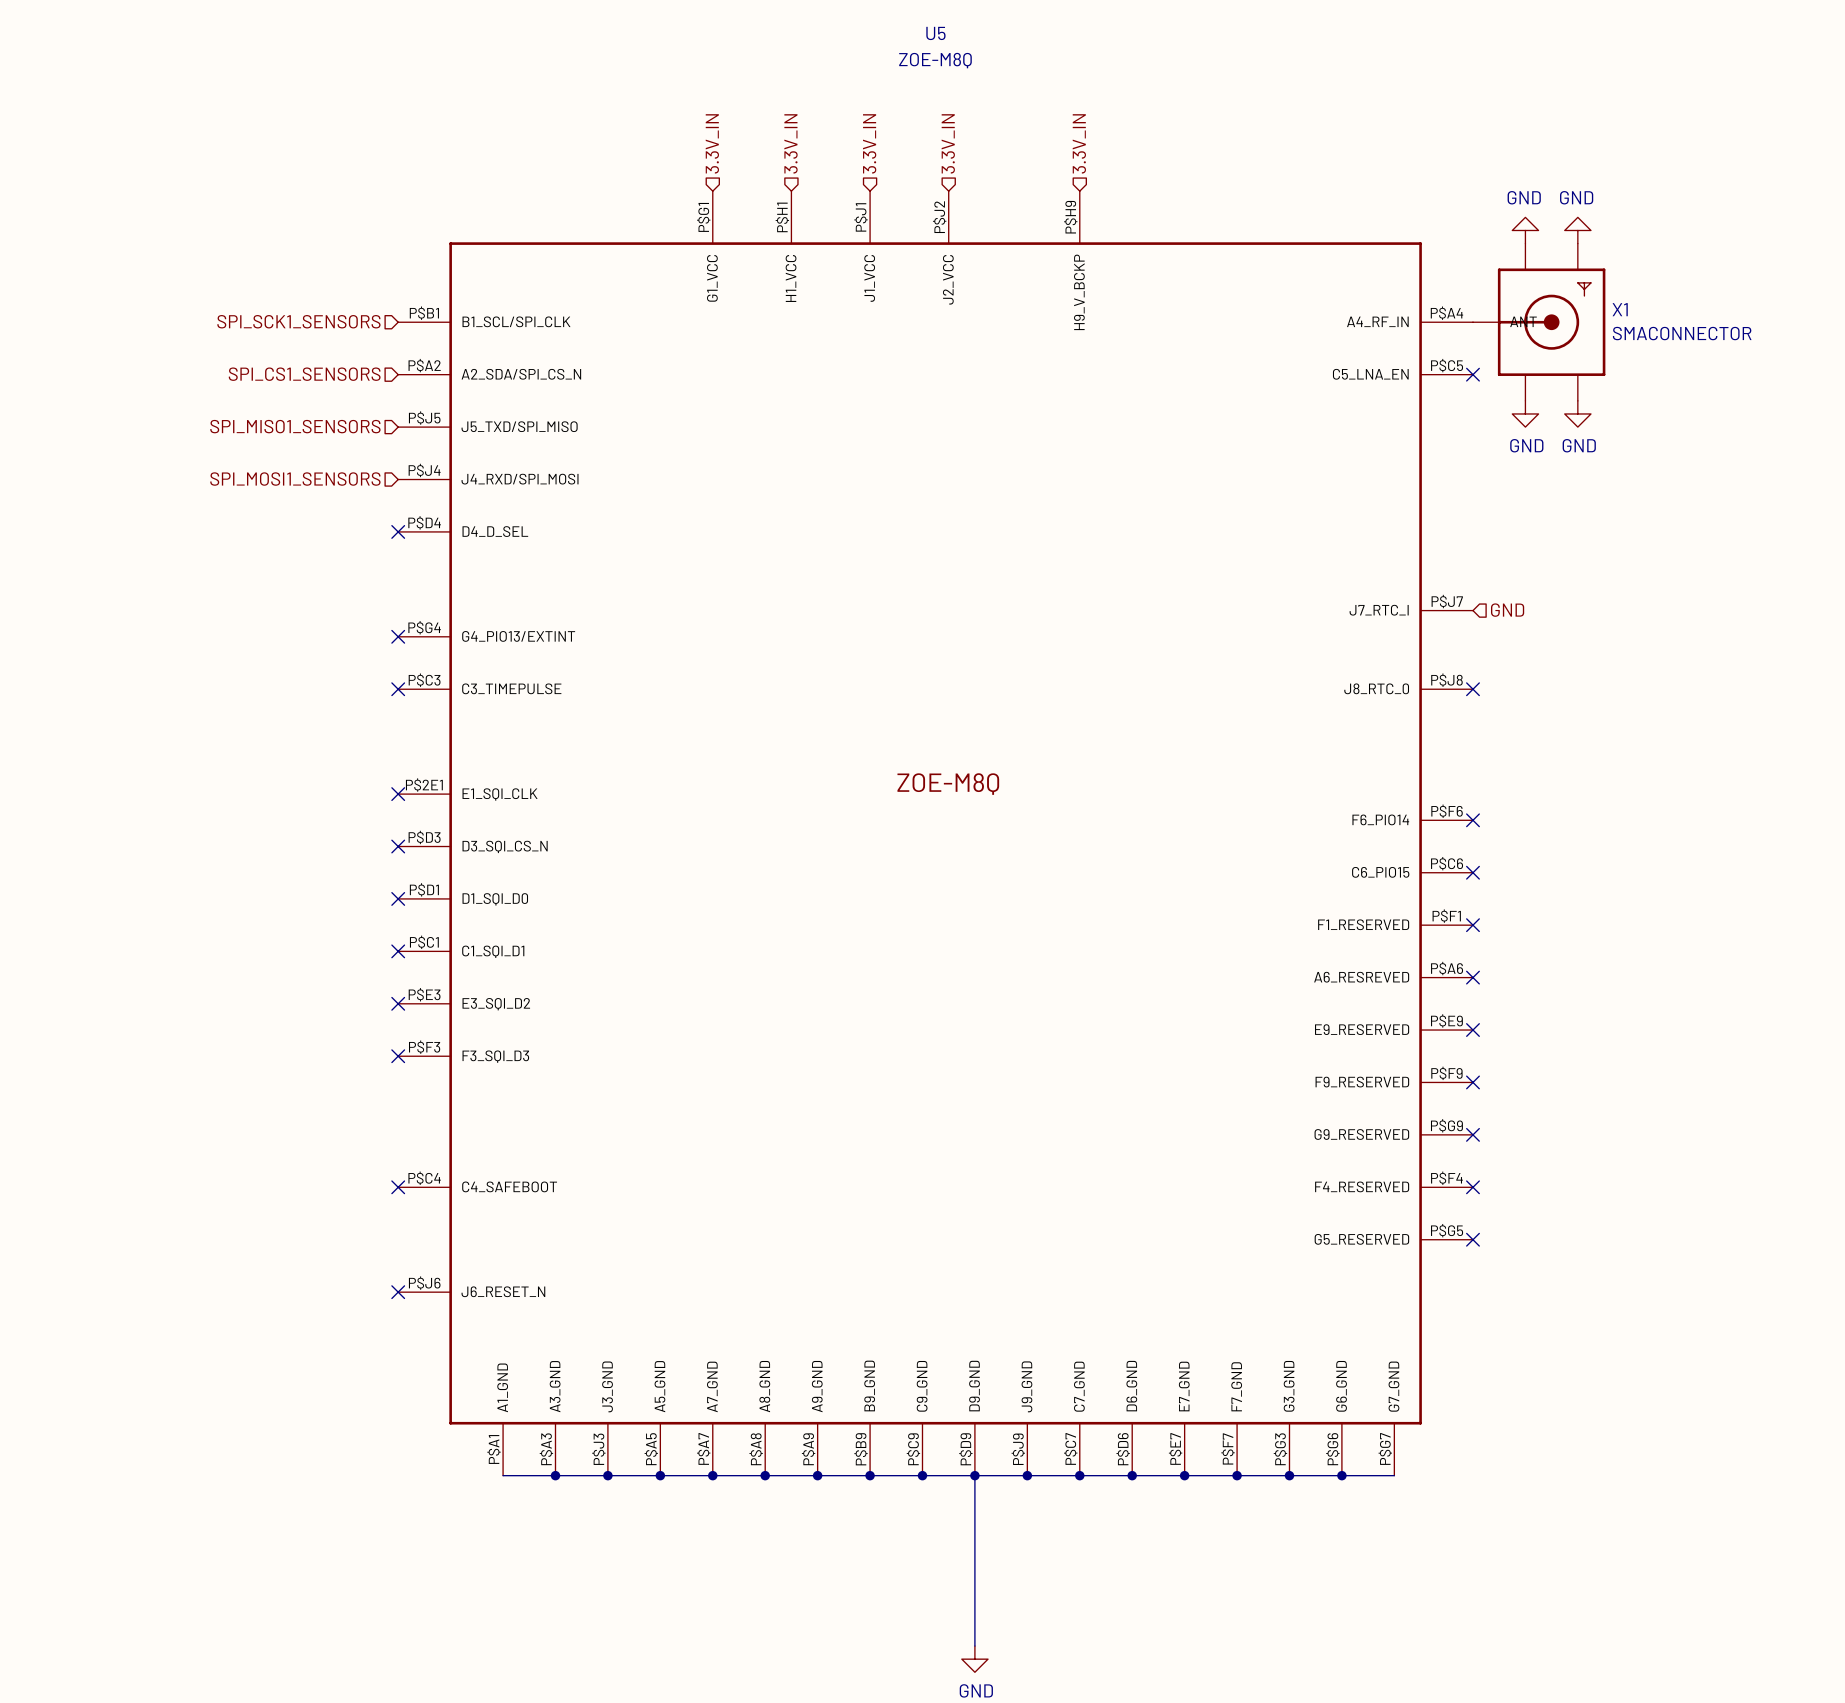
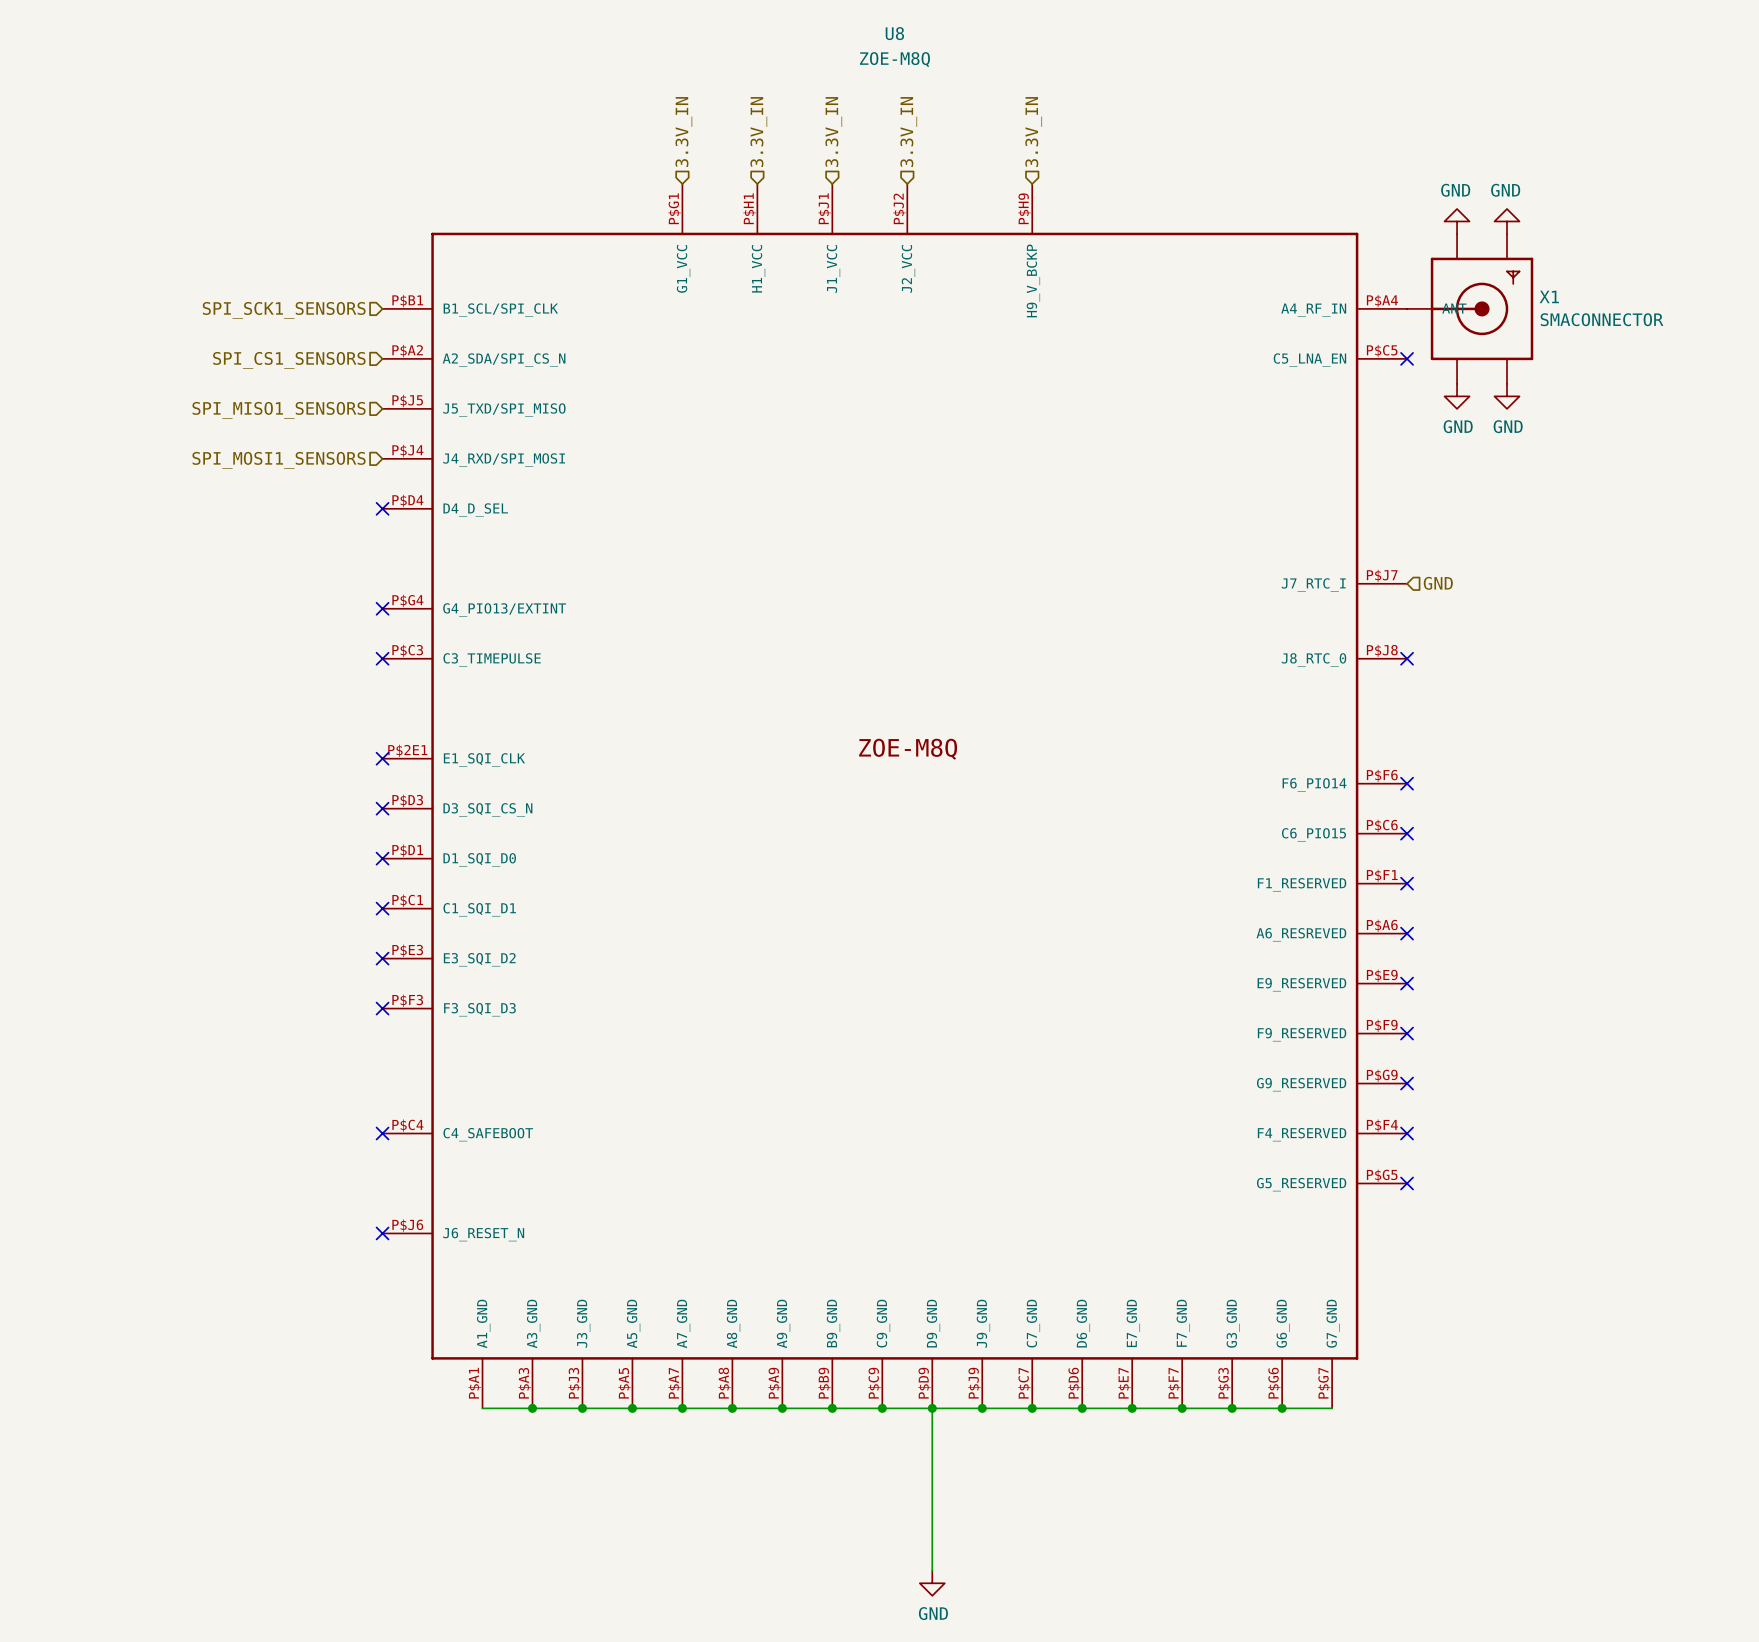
U5 name: U5 (935, 33) -> U8 (894, 33)

